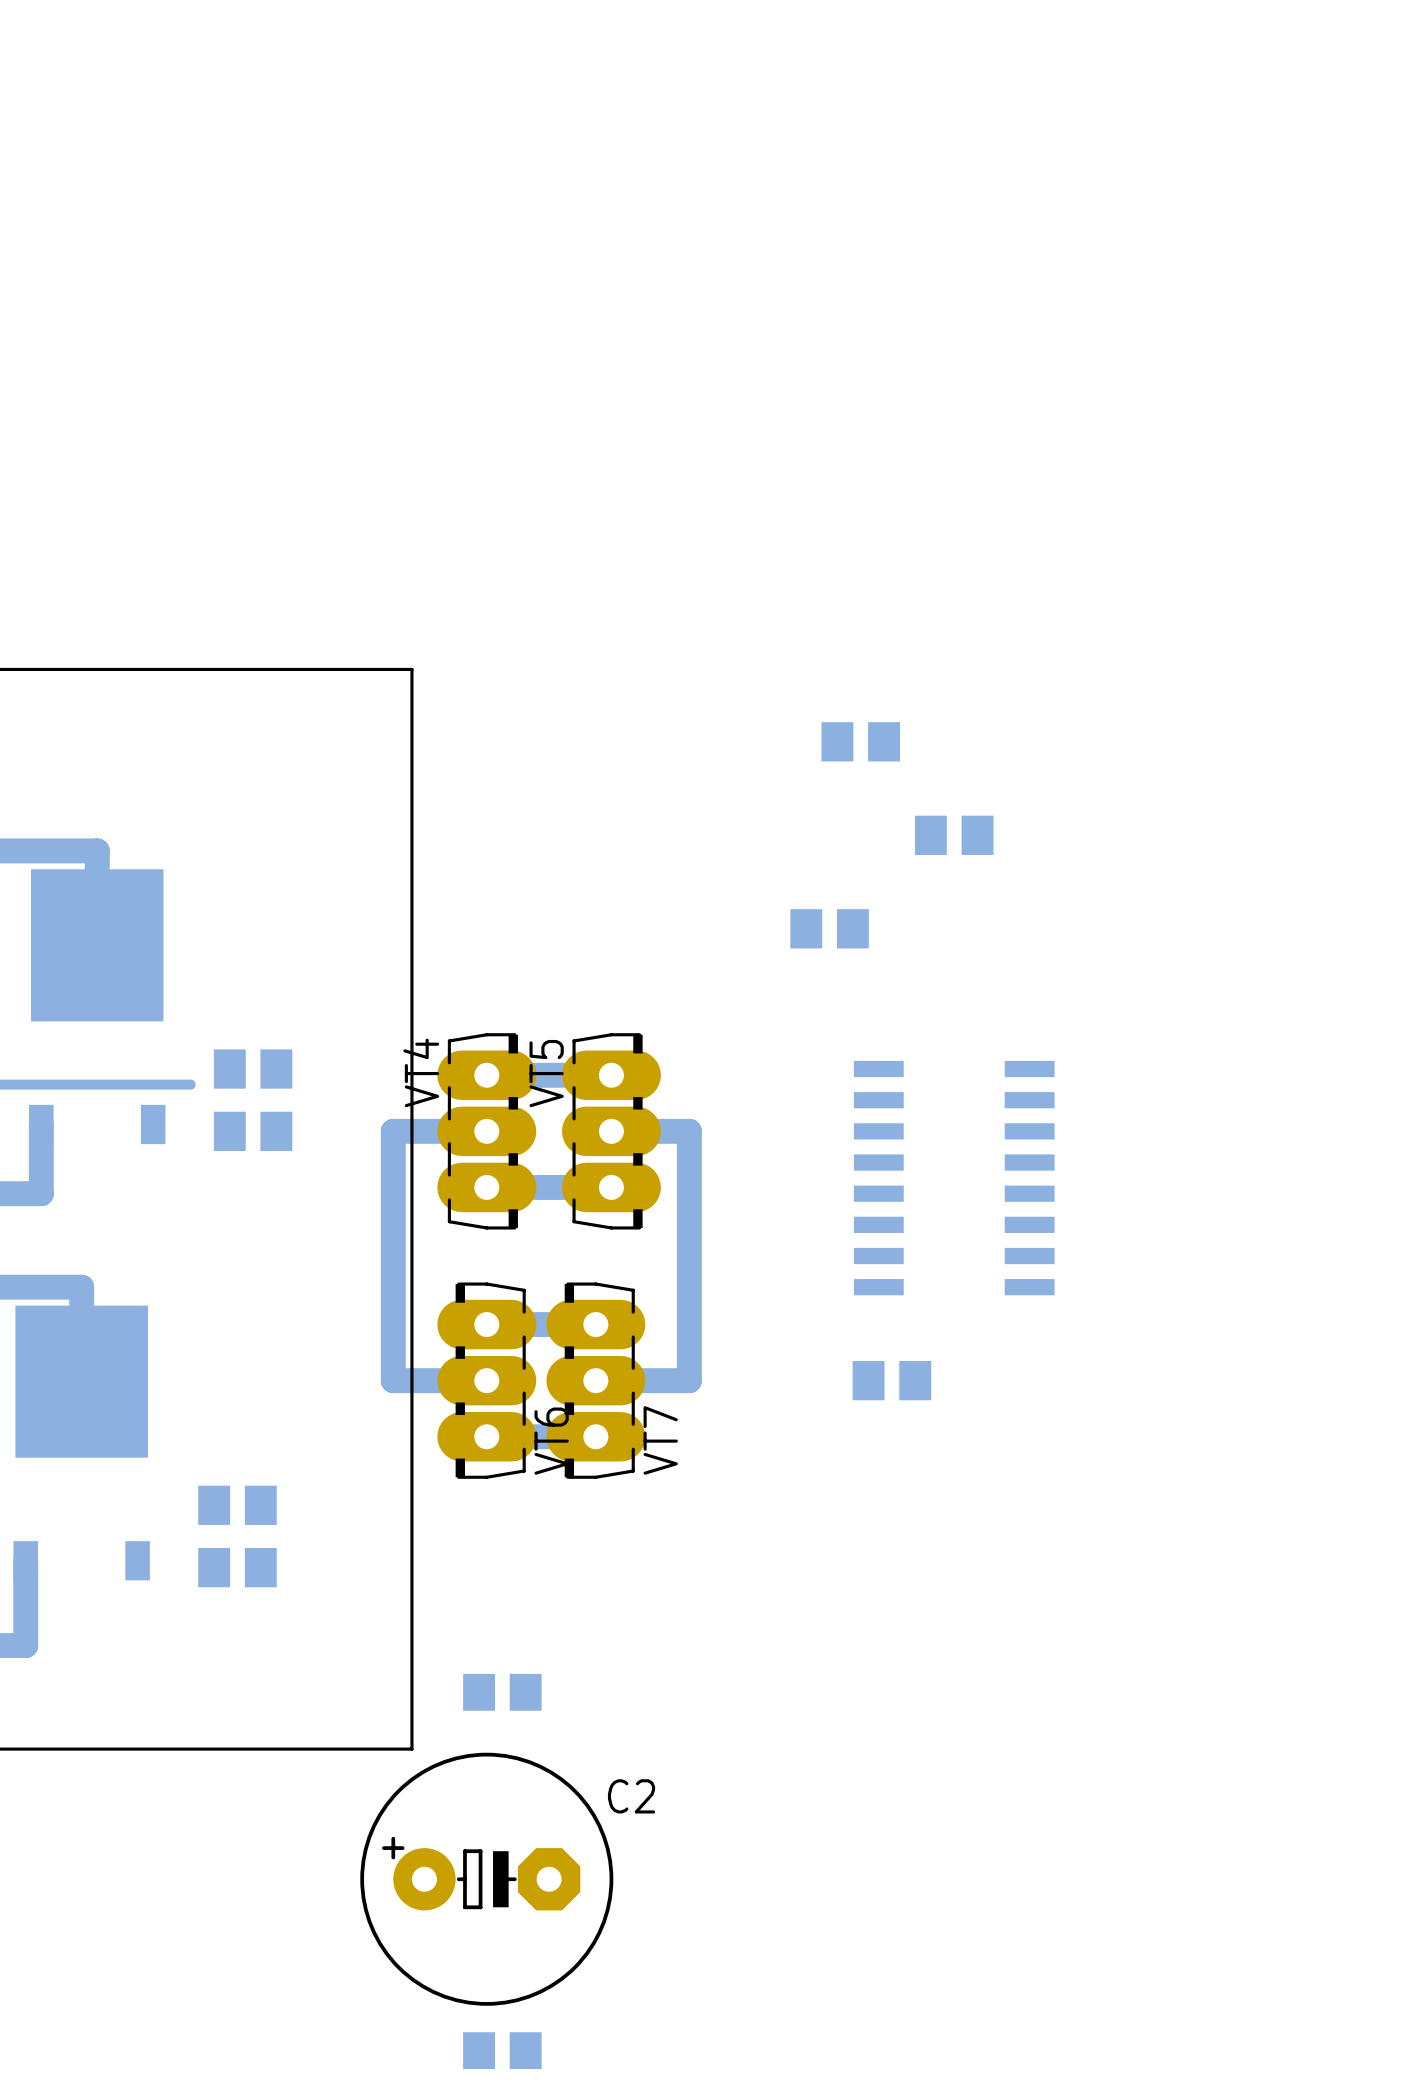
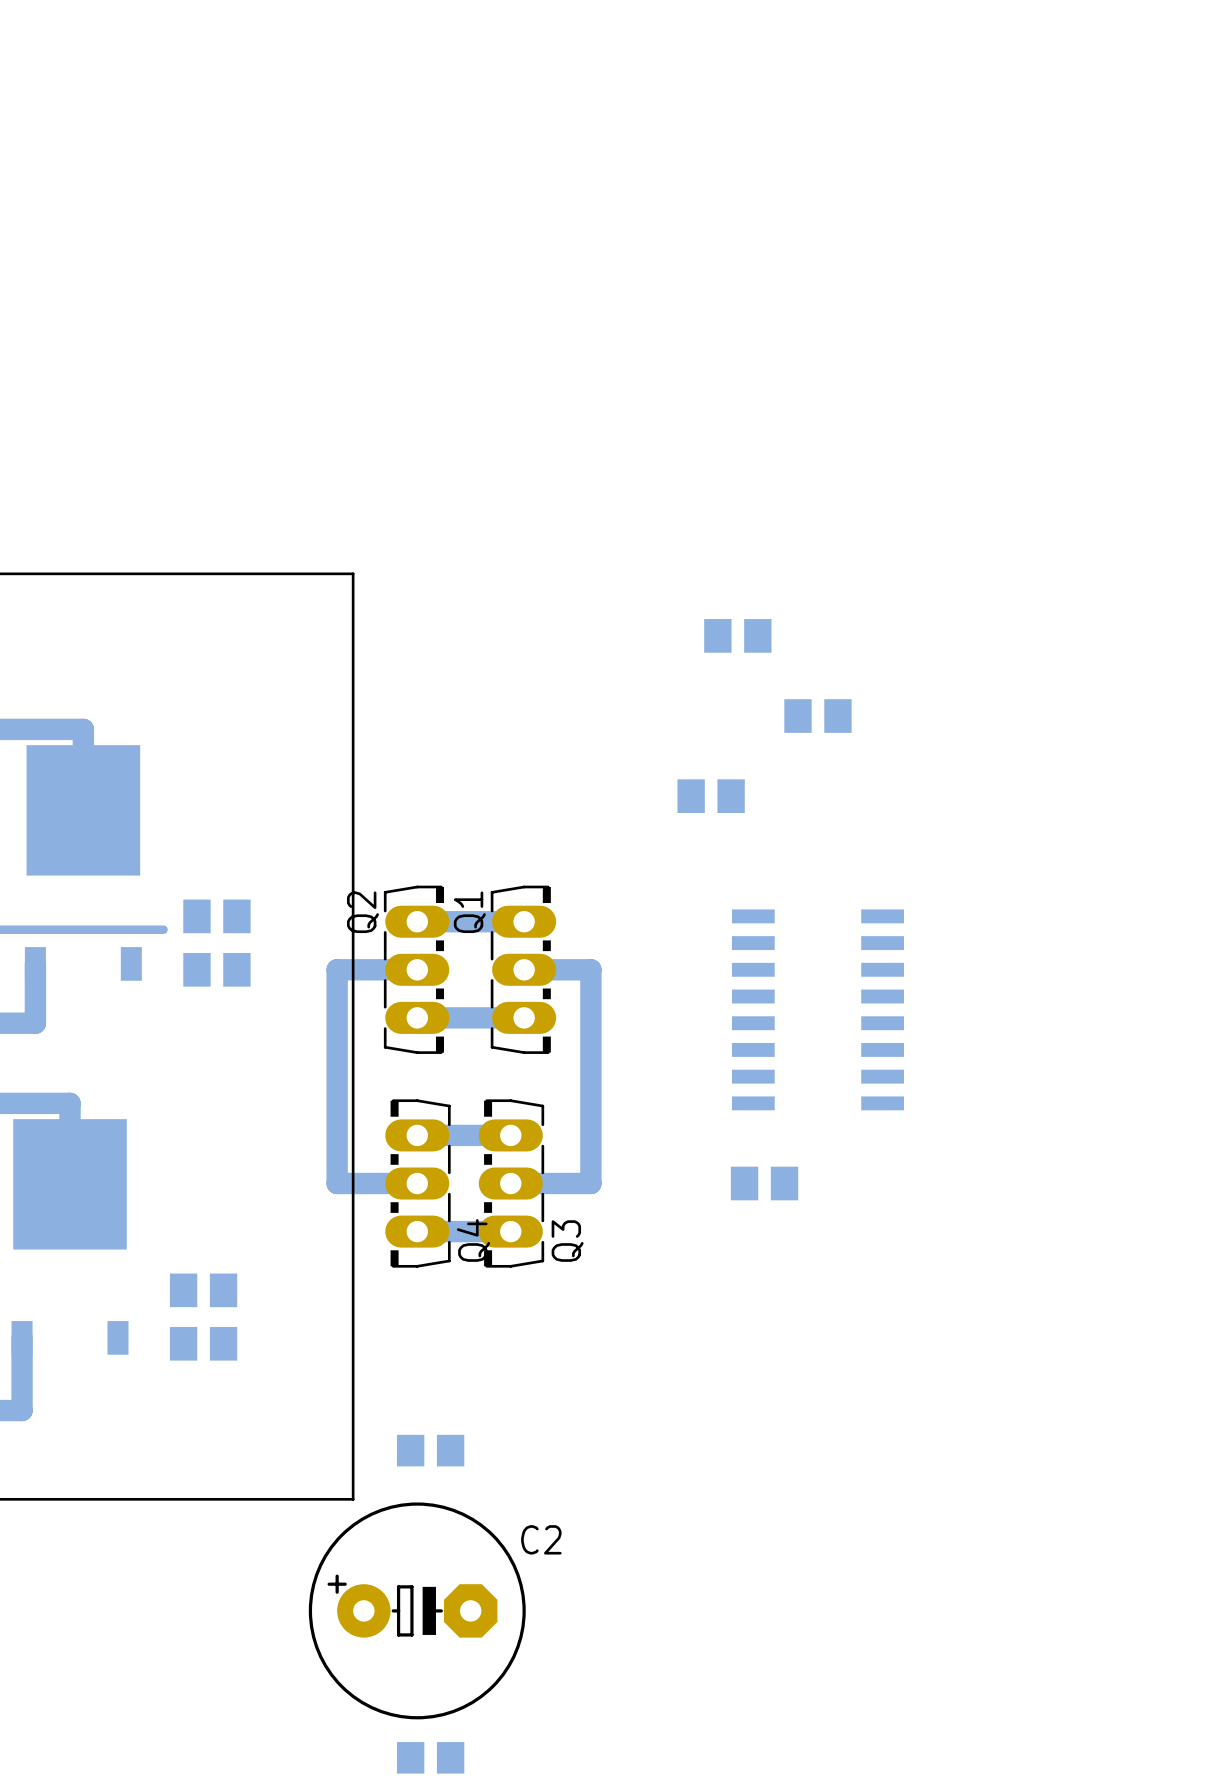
VT4: (486, 1131) -> none
Q2: none -> (416, 969)
Q1: none -> (523, 969)
VT5: (611, 1131) -> none
VT6: (486, 1380) -> none
Q4: none -> (417, 1183)
VT7: (595, 1380) -> none
Q3: none -> (511, 1183)

